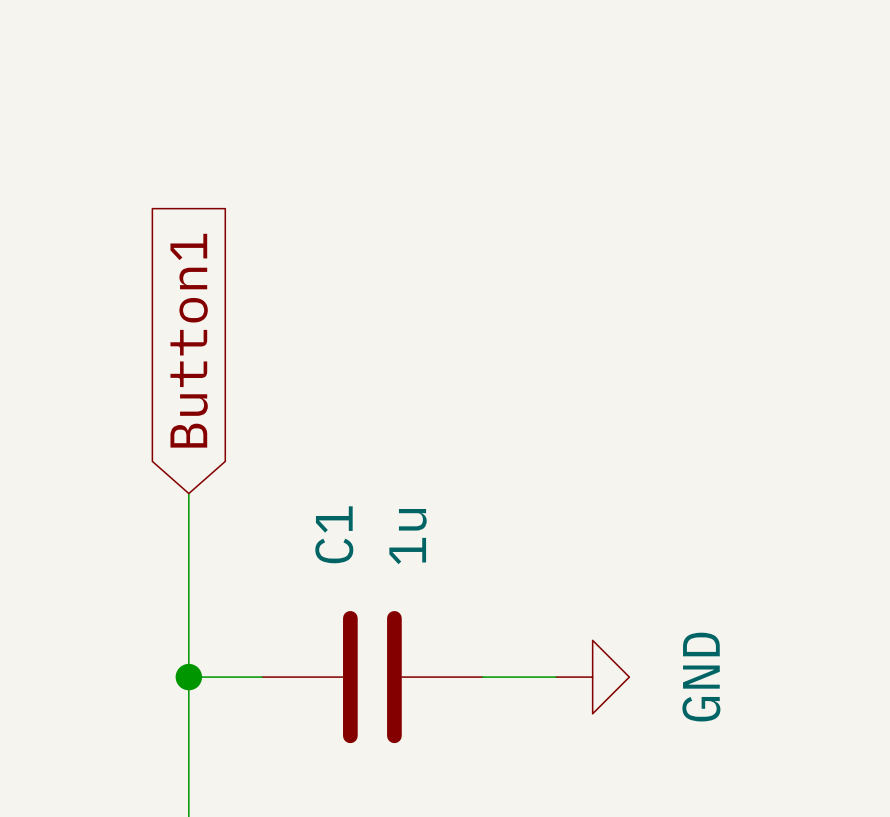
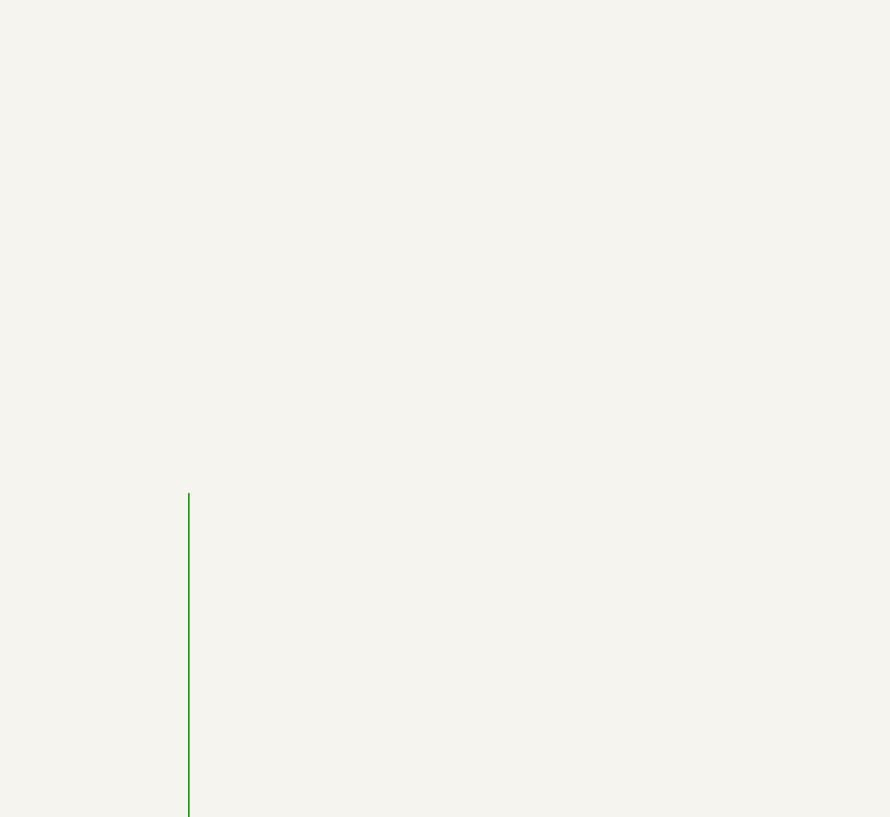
global label: Button1 (189, 340) -> none
wire: (188, 677) (262, 677) -> none
junction: (188, 677) -> none
C1: 1u (372, 677) -> none
wire: (482, 677) (555, 677) -> none
power symbol: GND (592, 677) -> none

